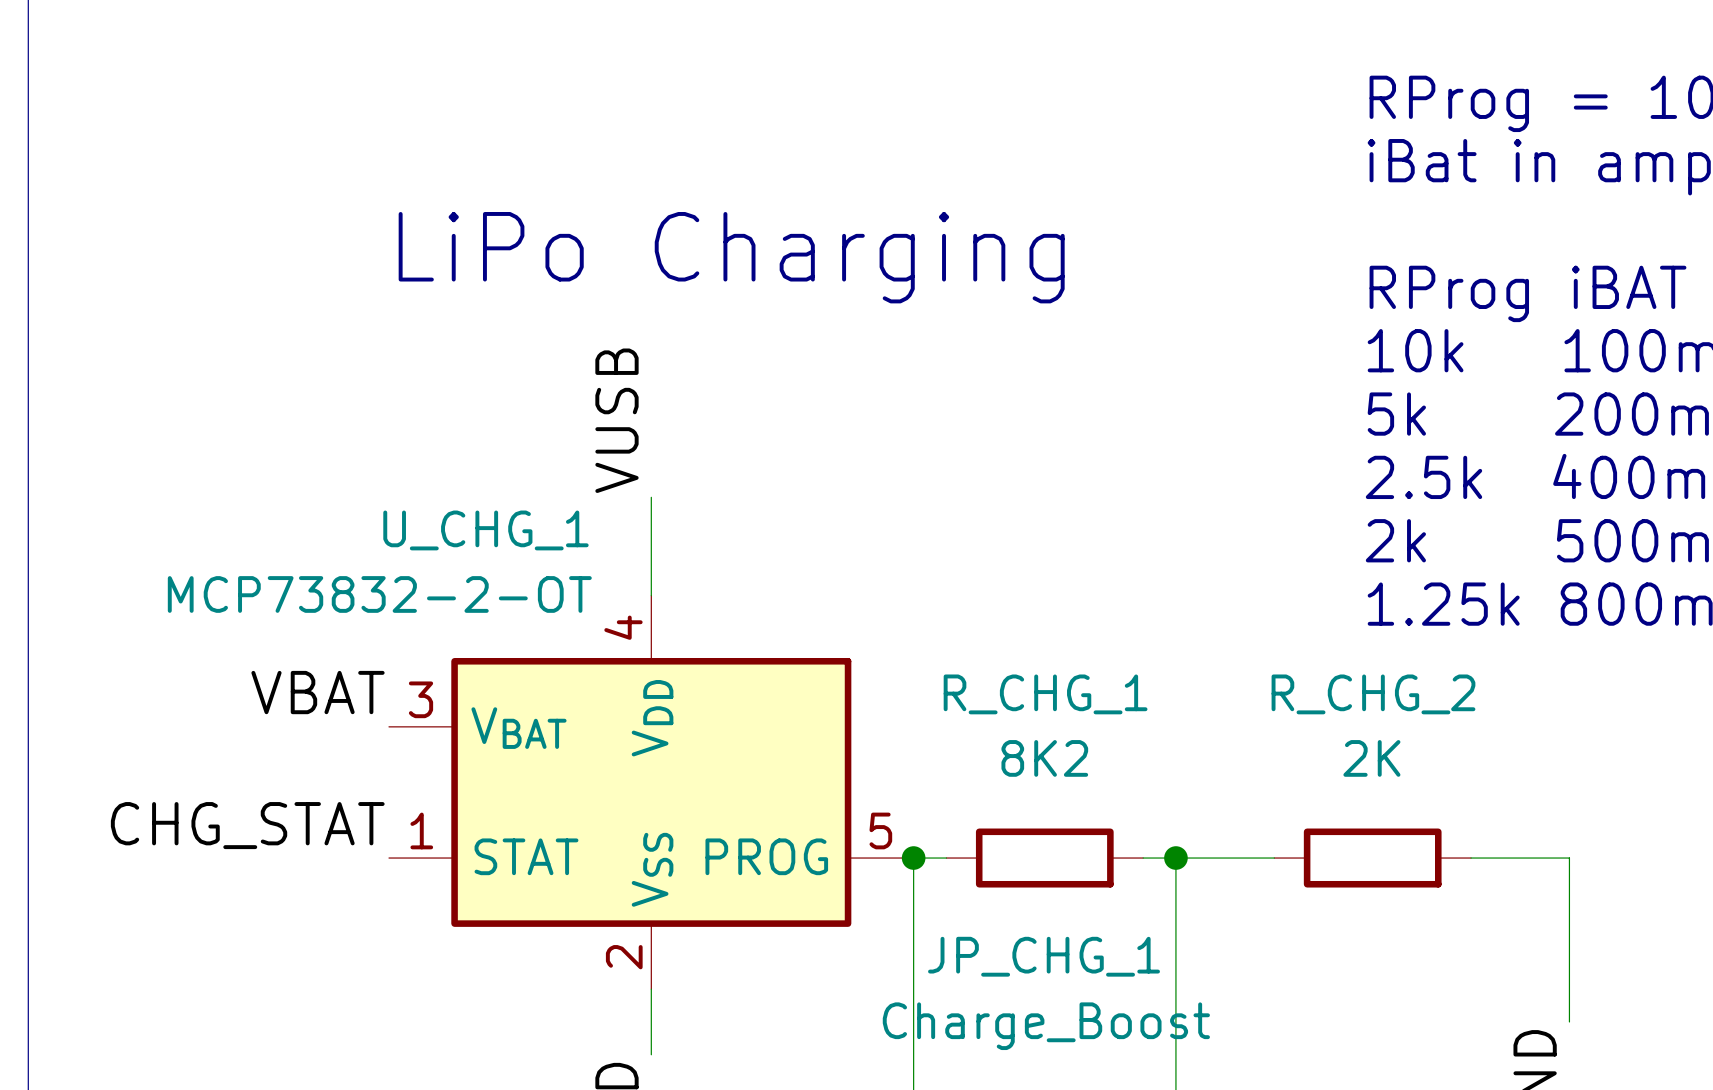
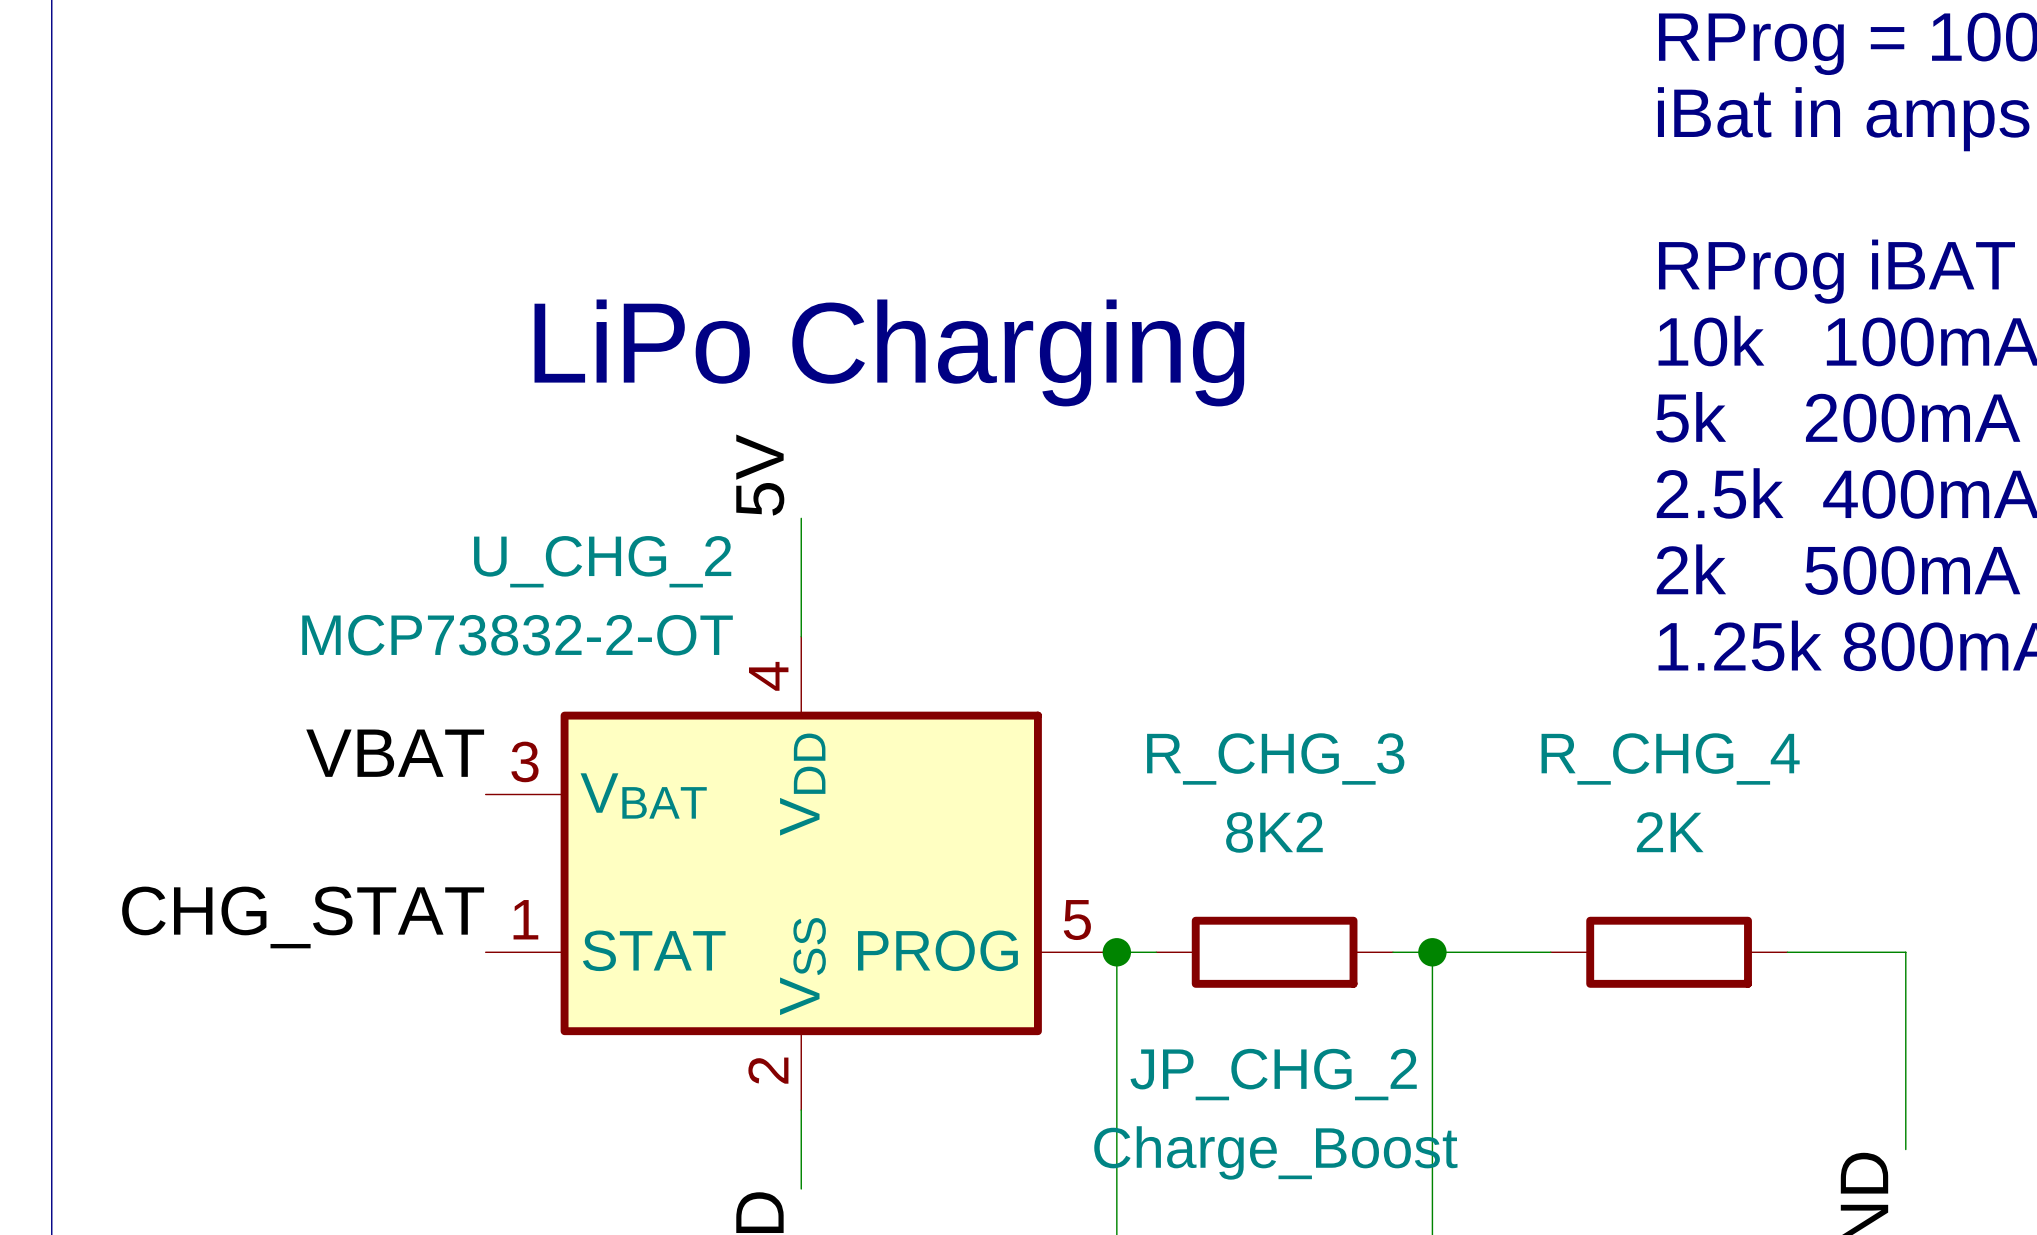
text position: LiPo Charging (731, 257) -> LiPo Charging (889, 352)
label: VUSB (616, 420) -> 5V (760, 475)
U_CHG_1 name: U_CHG_1 (485, 530) -> U_CHG_2 (602, 561)
R_CHG_1 name: R_CHG_1 (1045, 694) -> R_CHG_3 (1275, 758)
R_CHG_2 name: R_CHG_2 (1373, 694) -> R_CHG_4 (1670, 758)
JP_CHG_1 name: JP_CHG_1 (1044, 956) -> JP_CHG_2 (1273, 1074)

